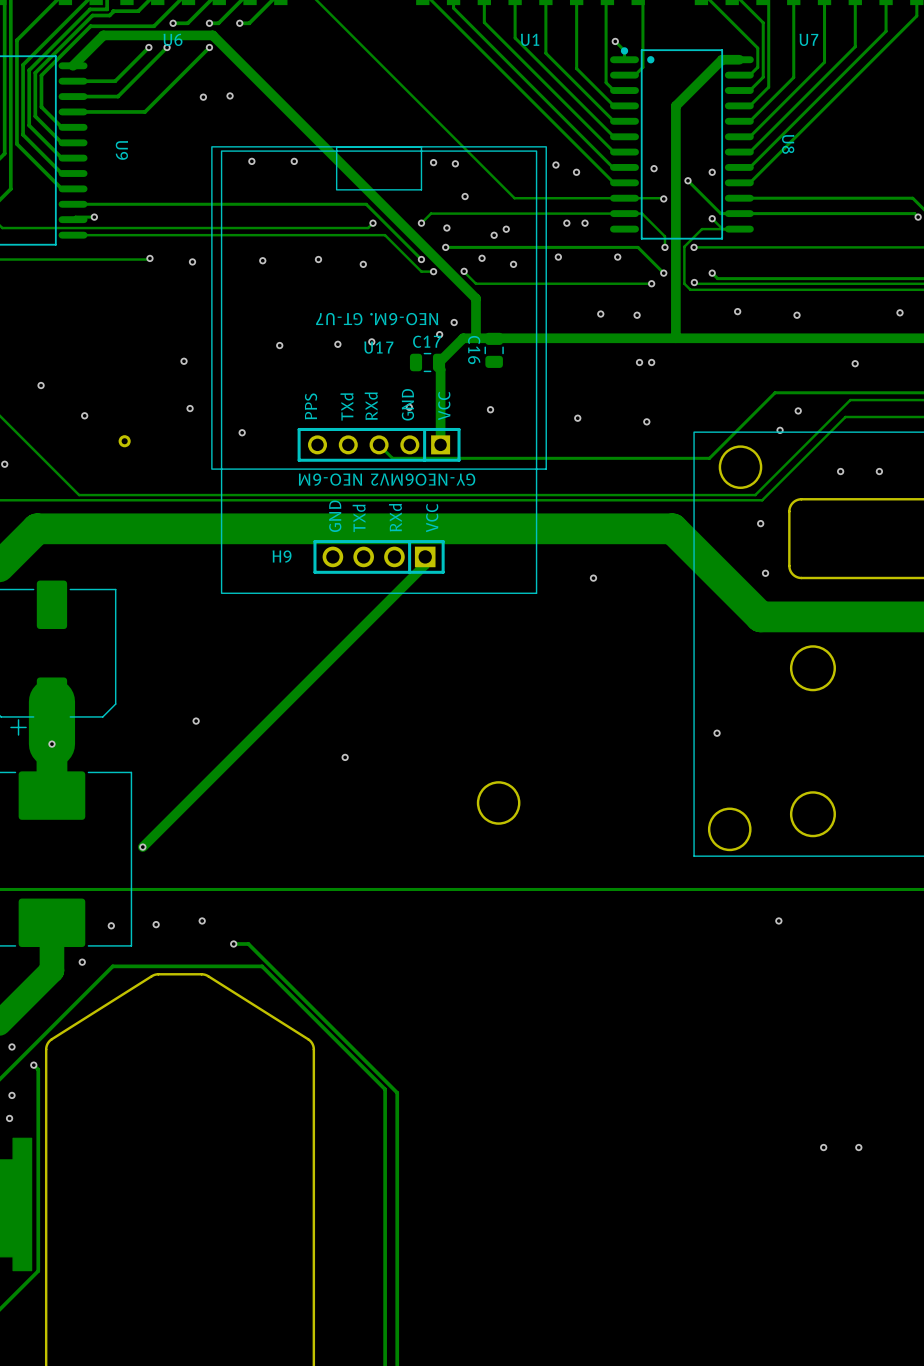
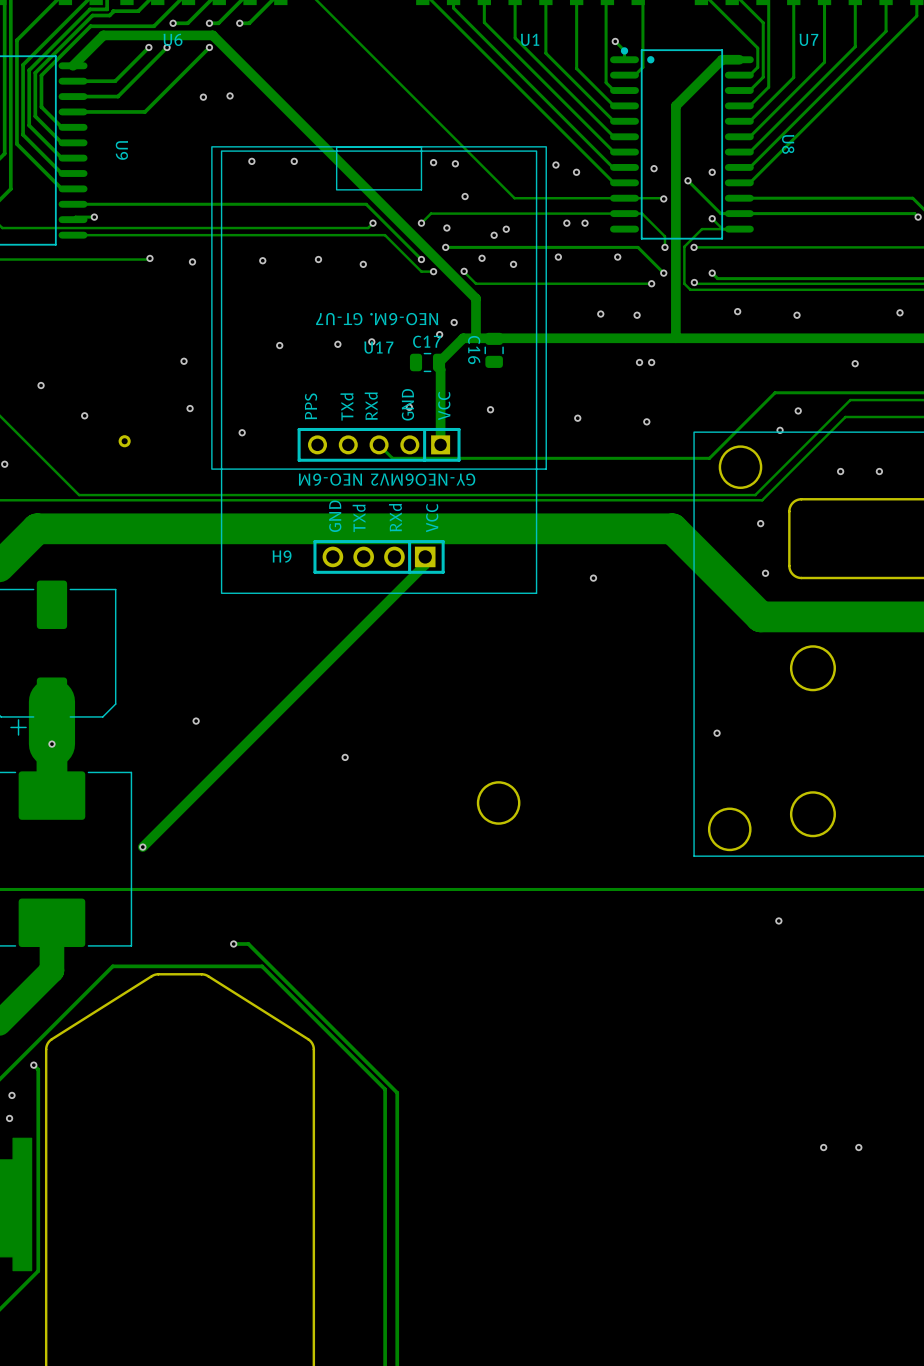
via: (202, 920) -> none
via: (156, 924) -> none
via: (111, 925) -> none
via: (82, 962) -> none
via: (11, 1046) -> none

